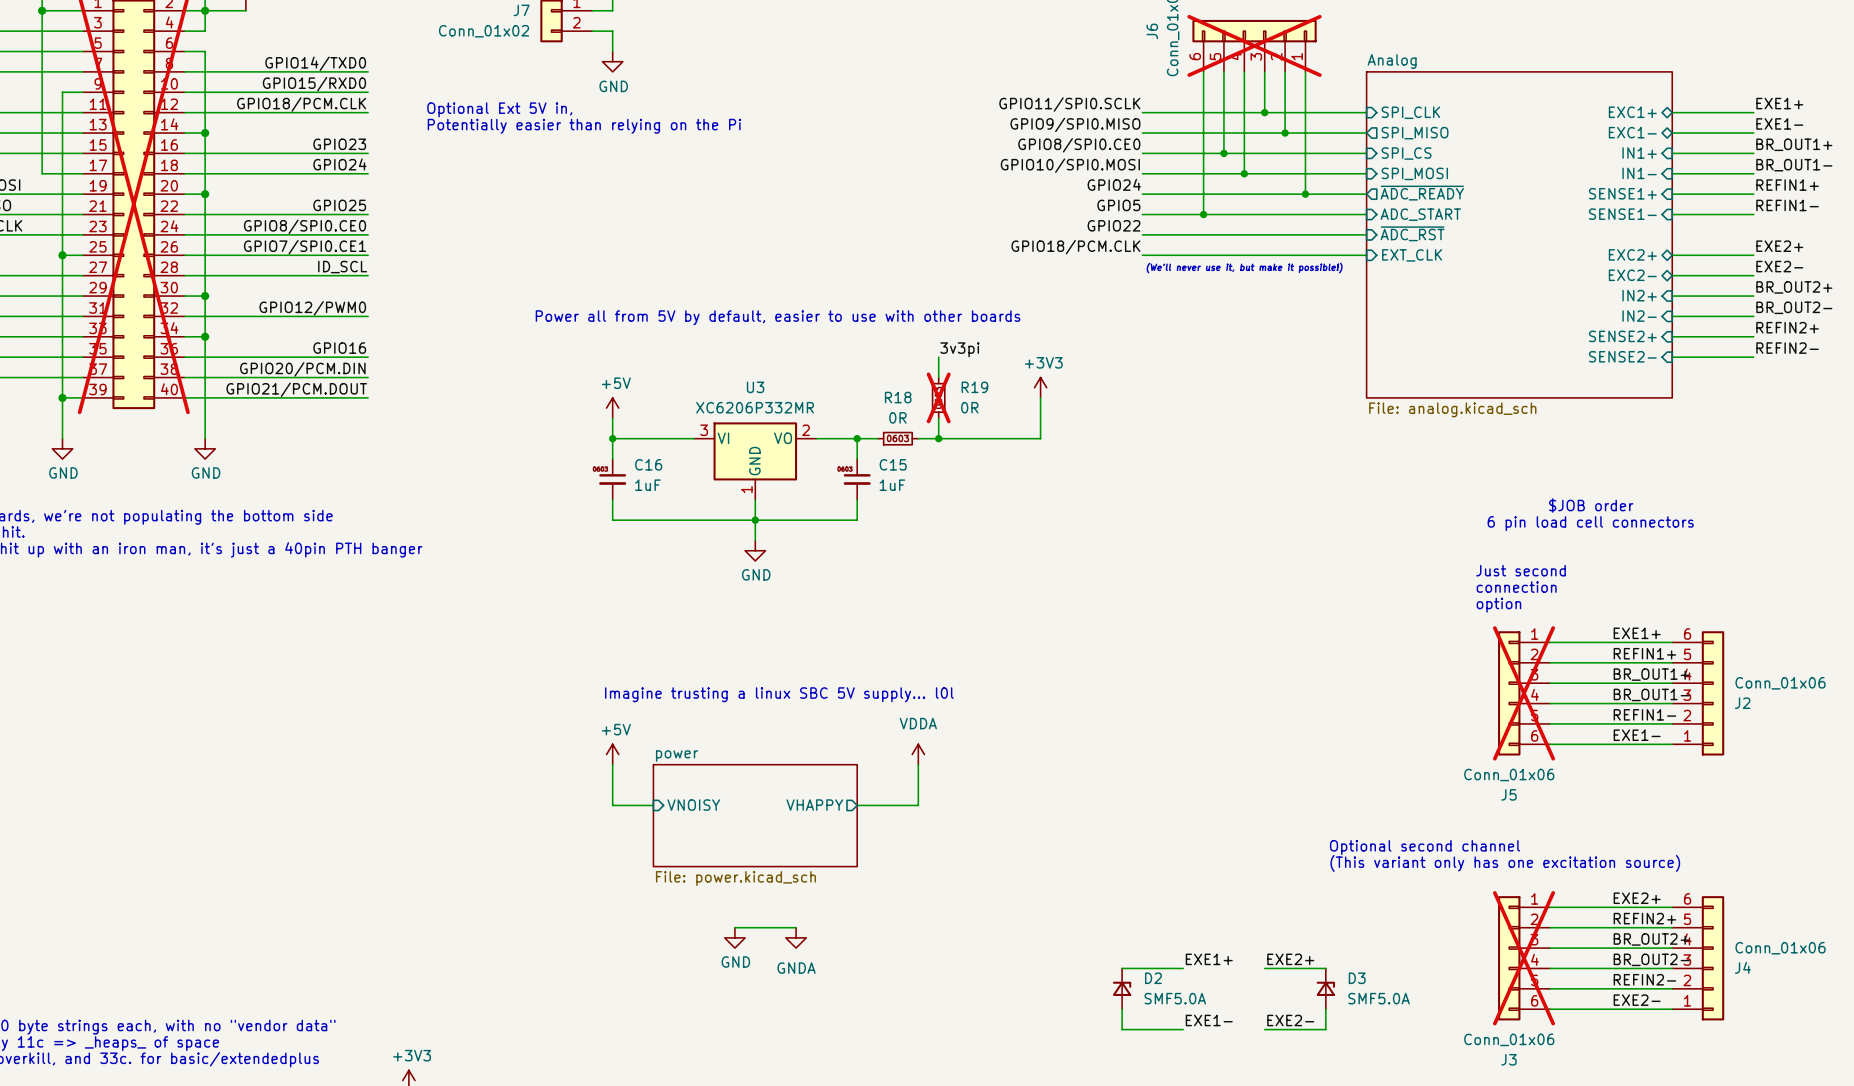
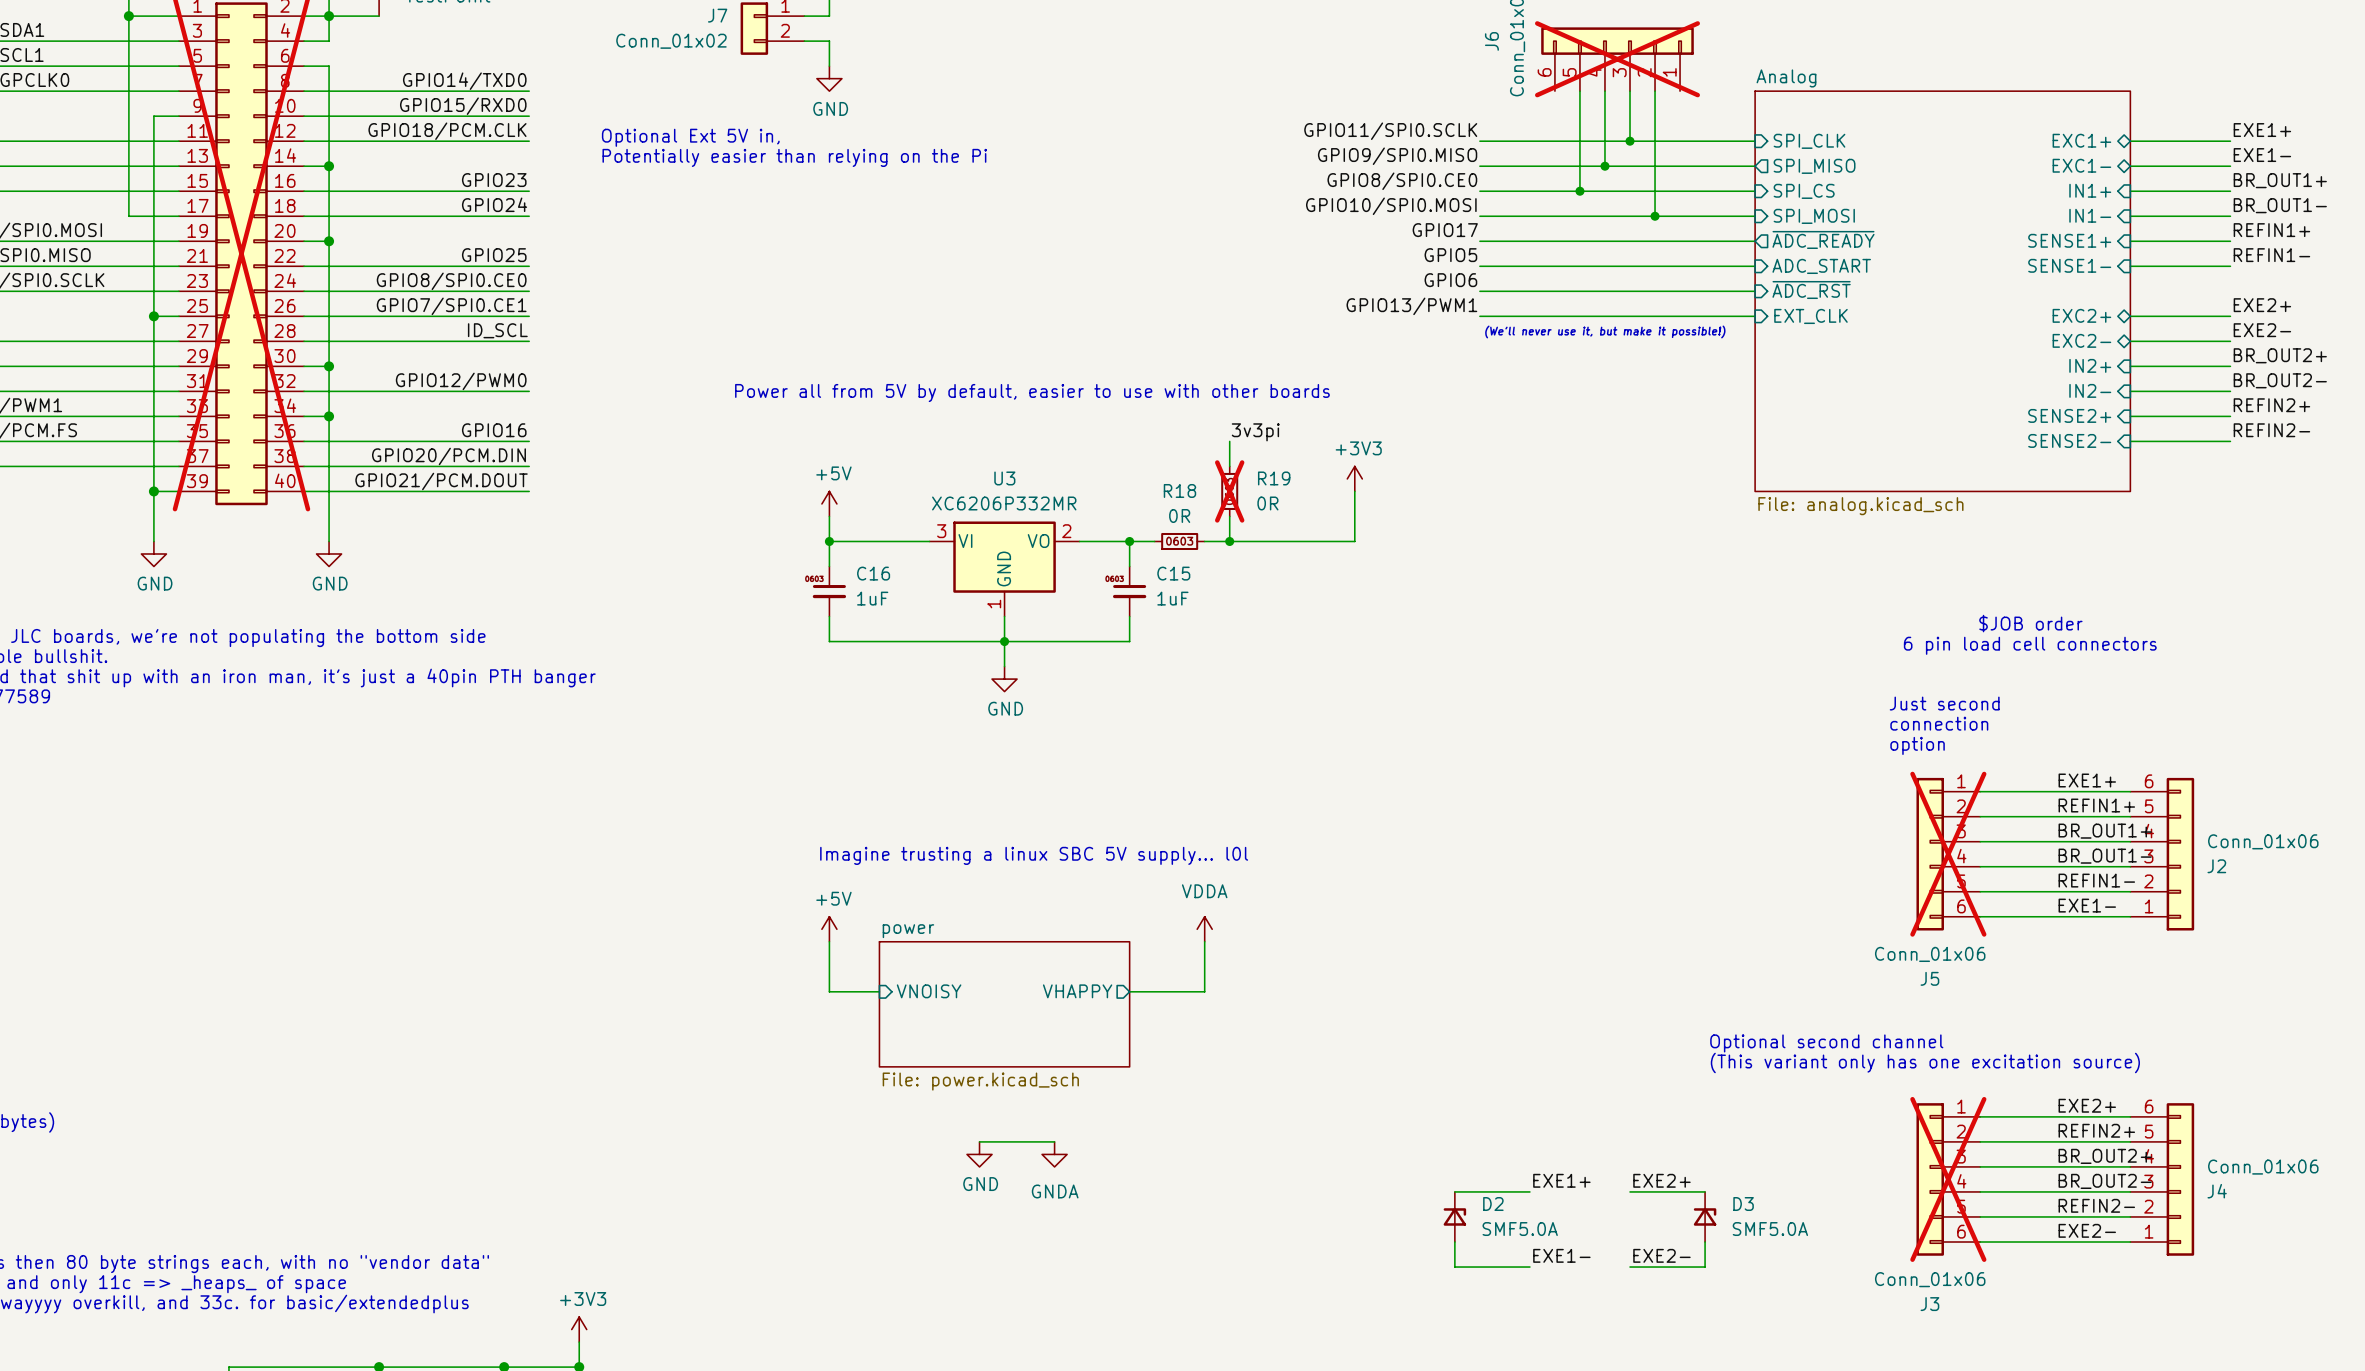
wire: (1203, 71) (1203, 214) -> none
wire: (1305, 71) (1305, 194) -> none
wire: (1244, 133) (1244, 173) -> (1655, 166) (1655, 216)
junction: none -> (1604, 166)
junction: (1285, 133) -> none
junction: (1244, 173) -> none
junction: none -> (1655, 216)
label: GPIO24 (1114, 184) -> GPIO17 (1445, 230)
junction: (1305, 194) -> none
junction: (1203, 214) -> none
label: GPIO22 (1114, 225) -> GPIO6 (1450, 280)
label: GPIO18/PCM.CLK (1075, 247) -> GPIO13/PWM1 (1411, 306)

